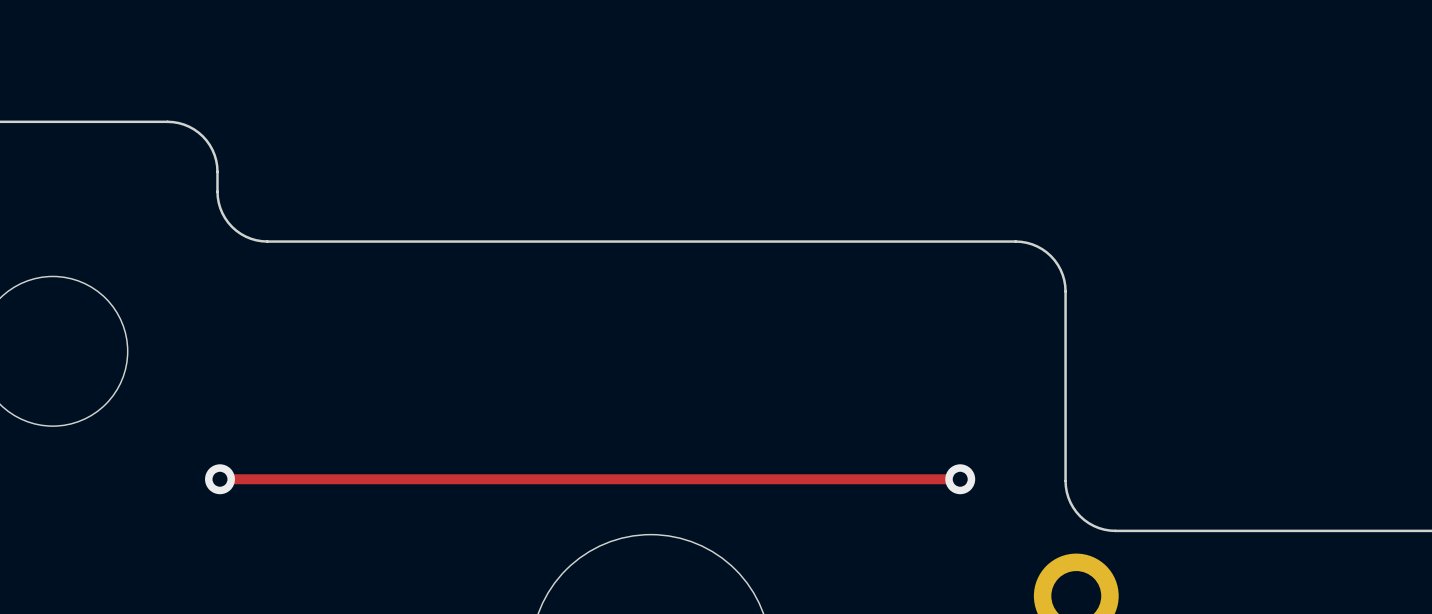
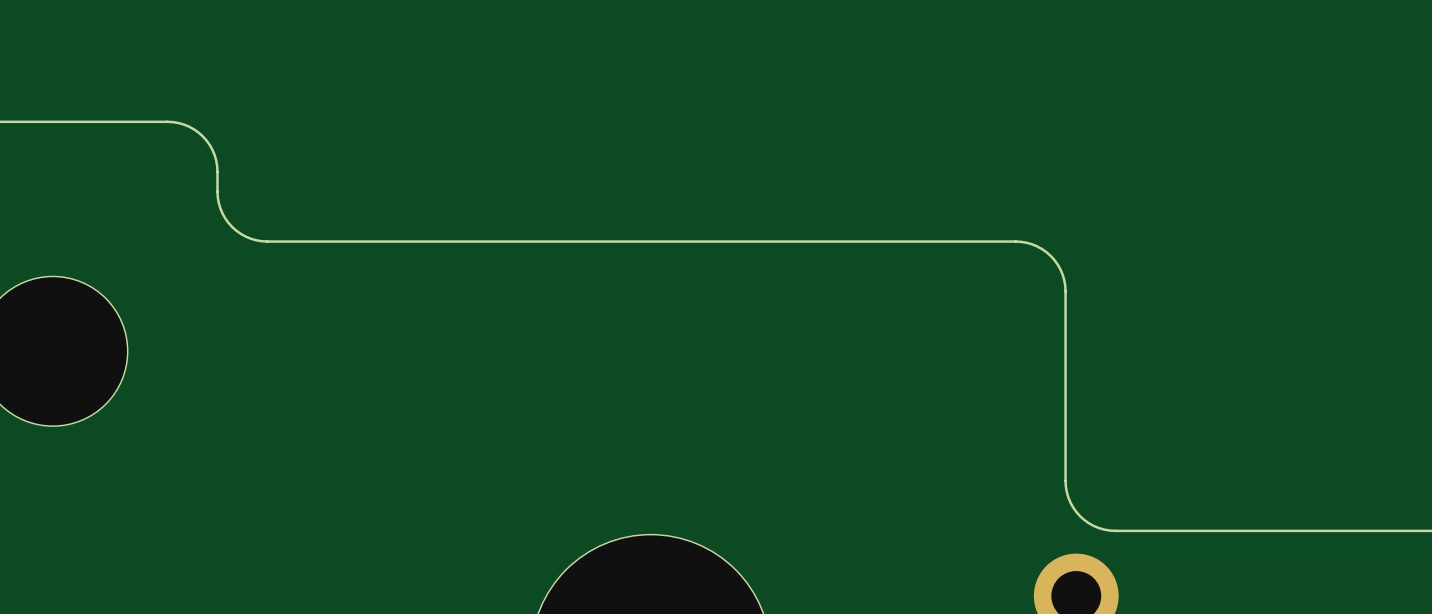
track: (219, 479) (960, 479) -> none
via: (219, 479) -> none
via: (960, 479) -> none

